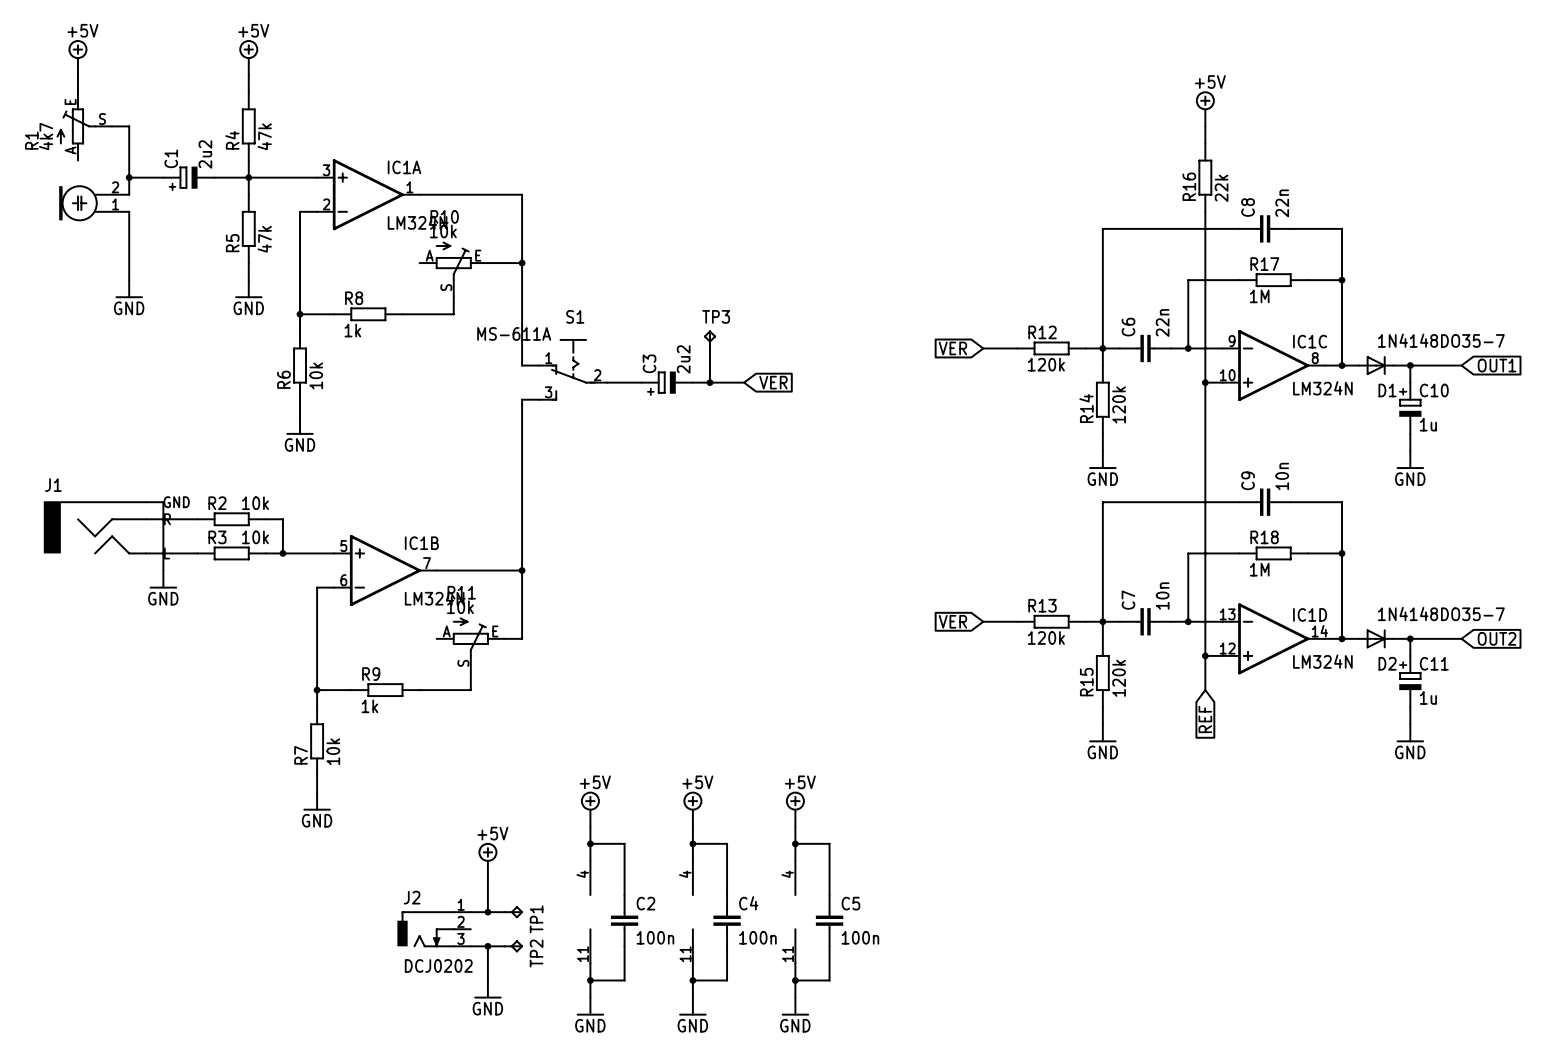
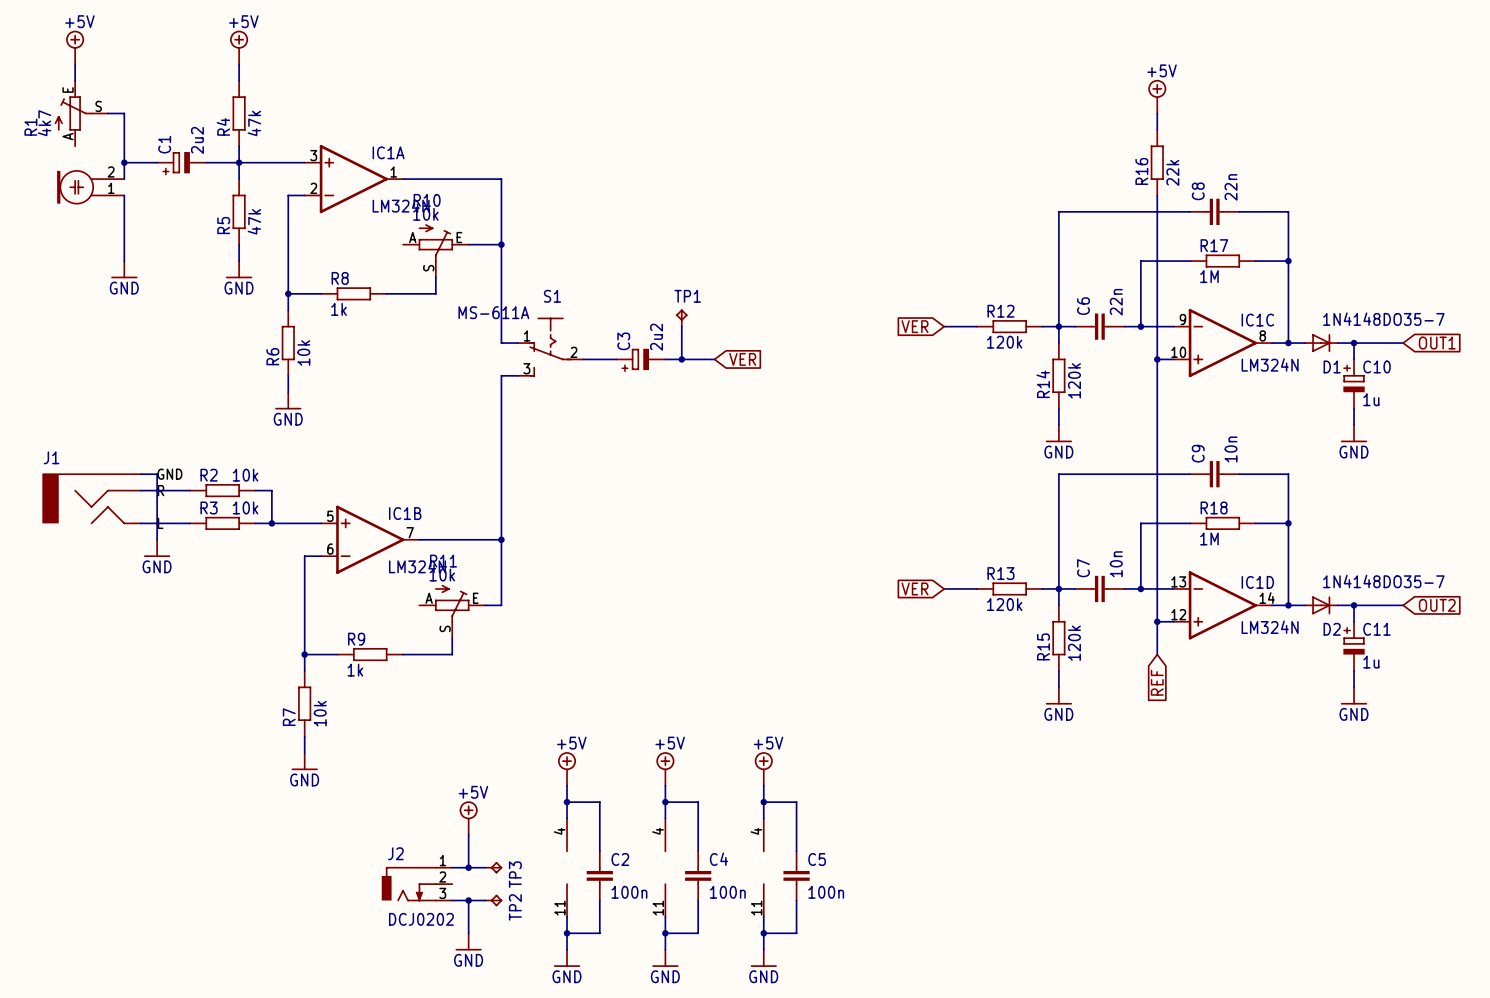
TP3 name: TP3 (716, 316) -> TP1 (687, 296)
TP1 name: TP1 (536, 919) -> TP3 (515, 874)

